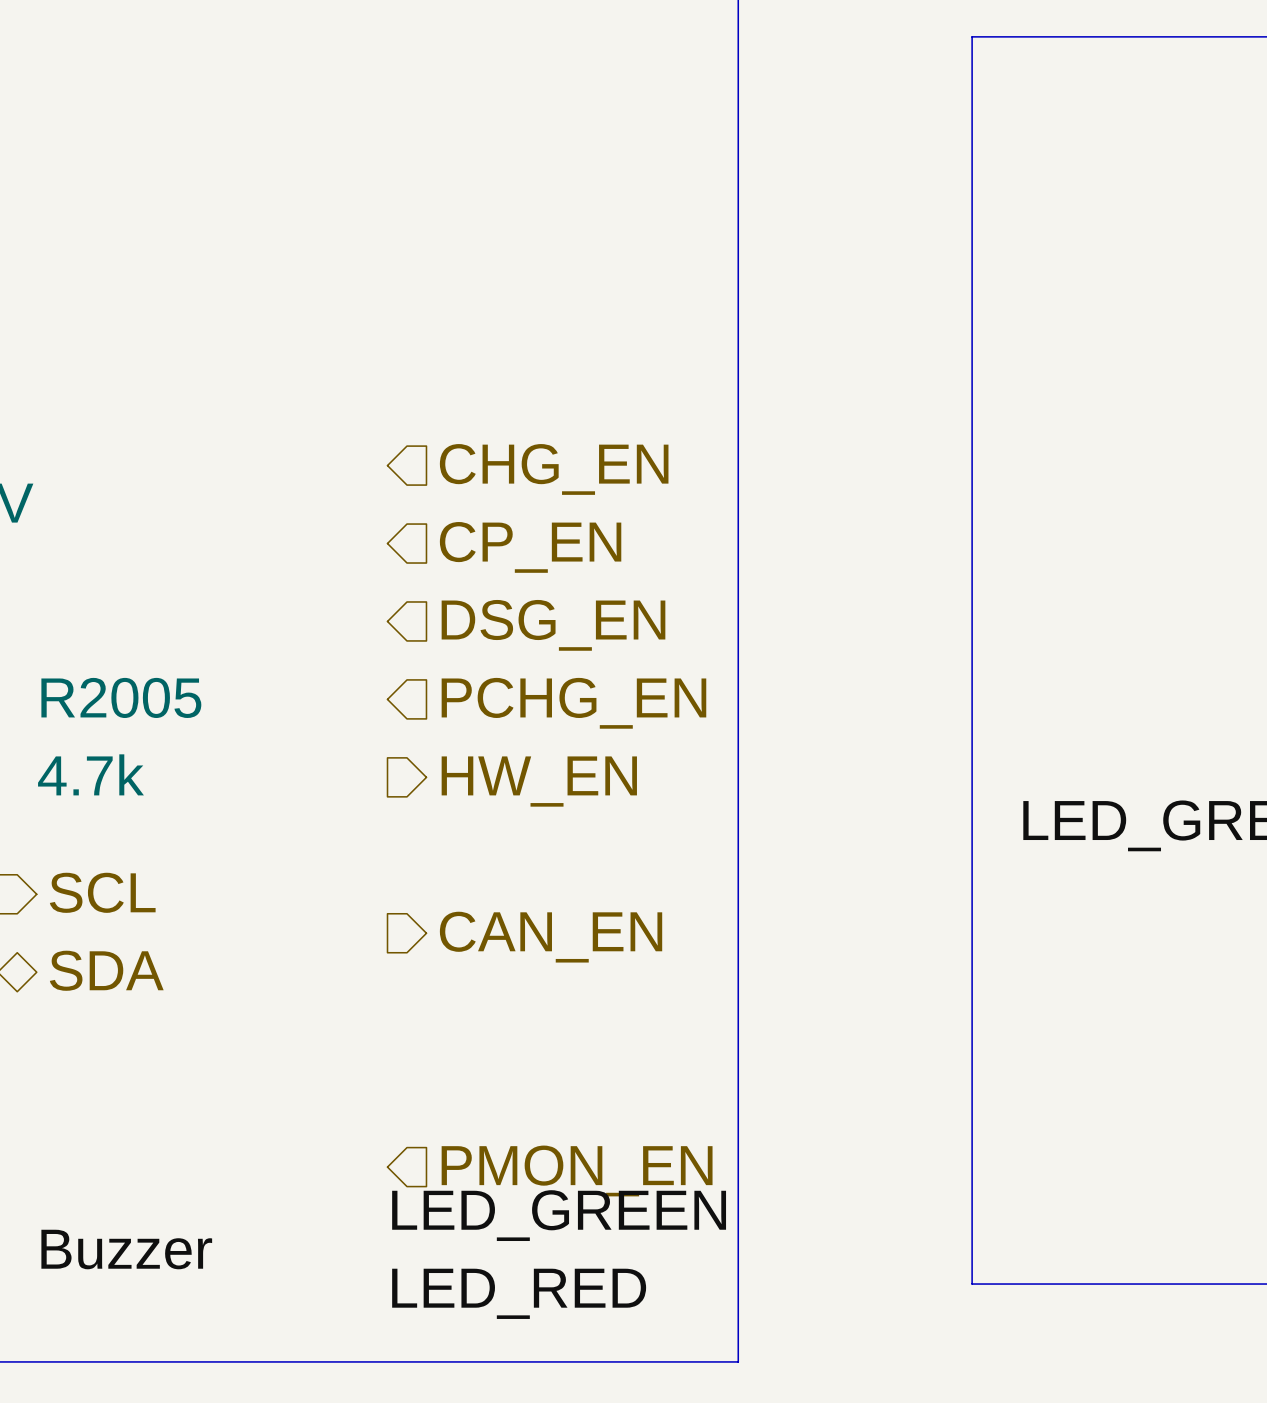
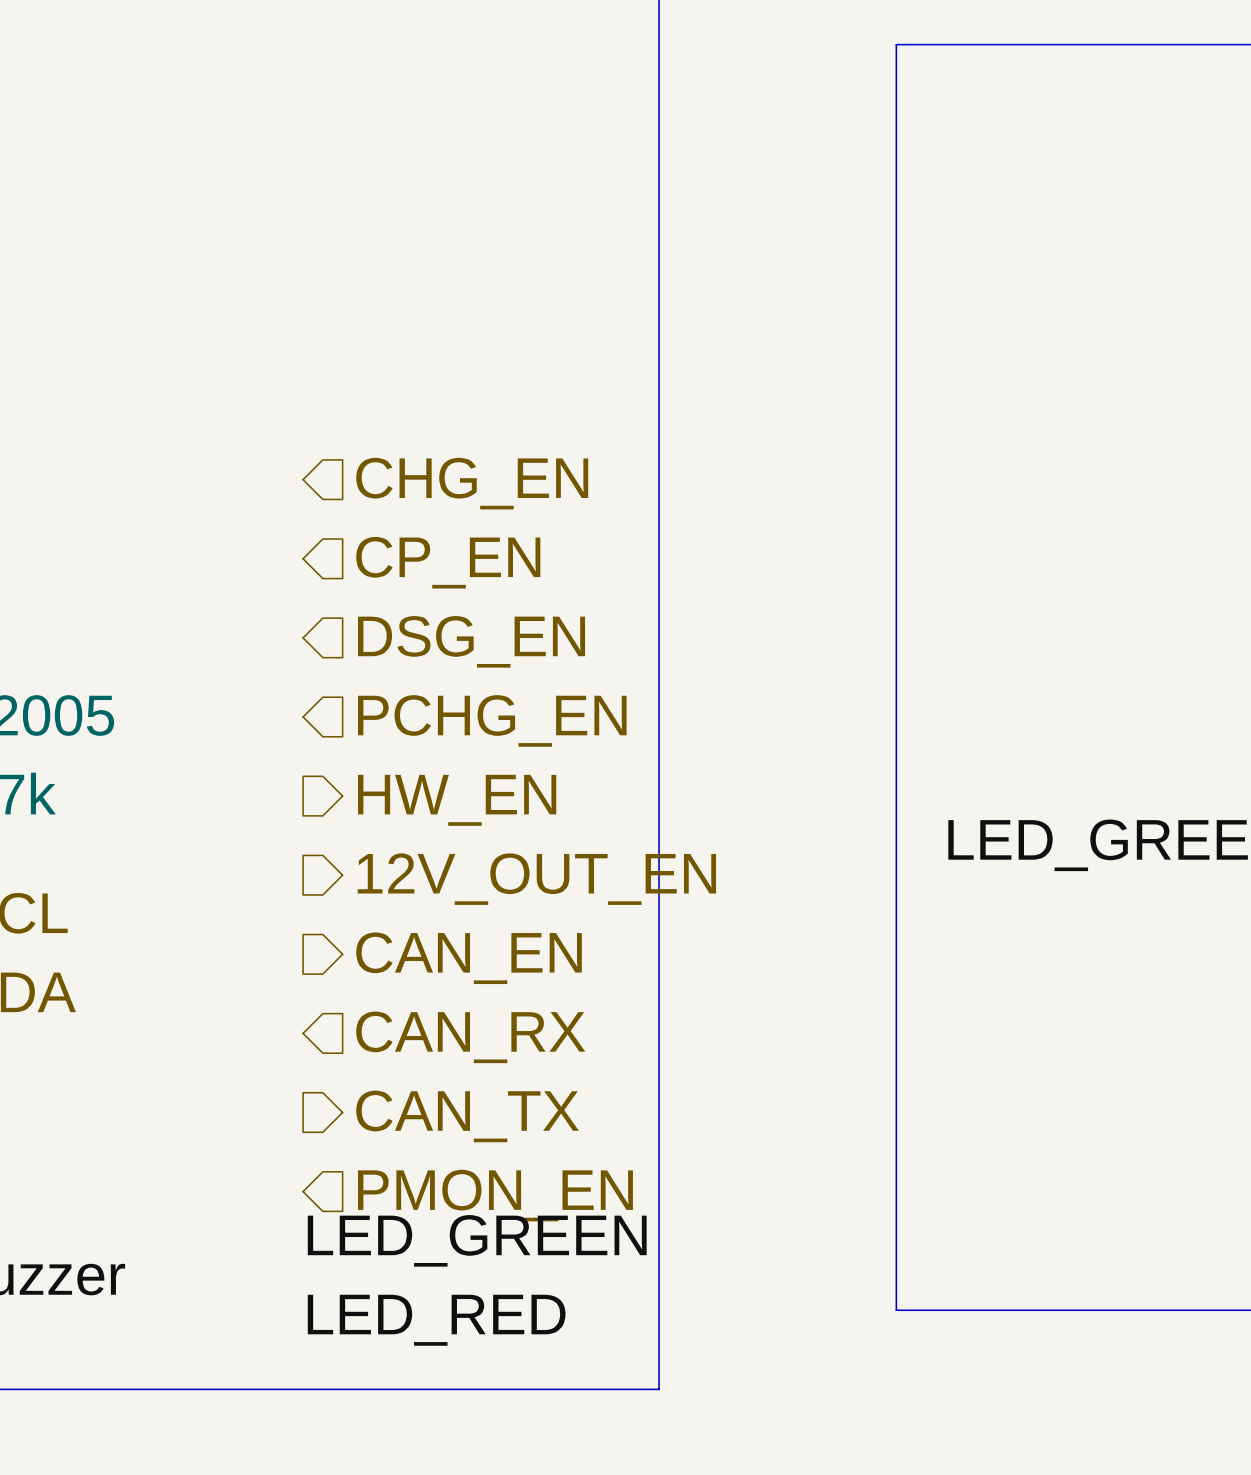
hierarchical label: none -> 12V_OUT_EN (536, 879)
hierarchical label: none -> CAN_RX (470, 1037)
hierarchical label: none -> CAN_TX (467, 1116)

